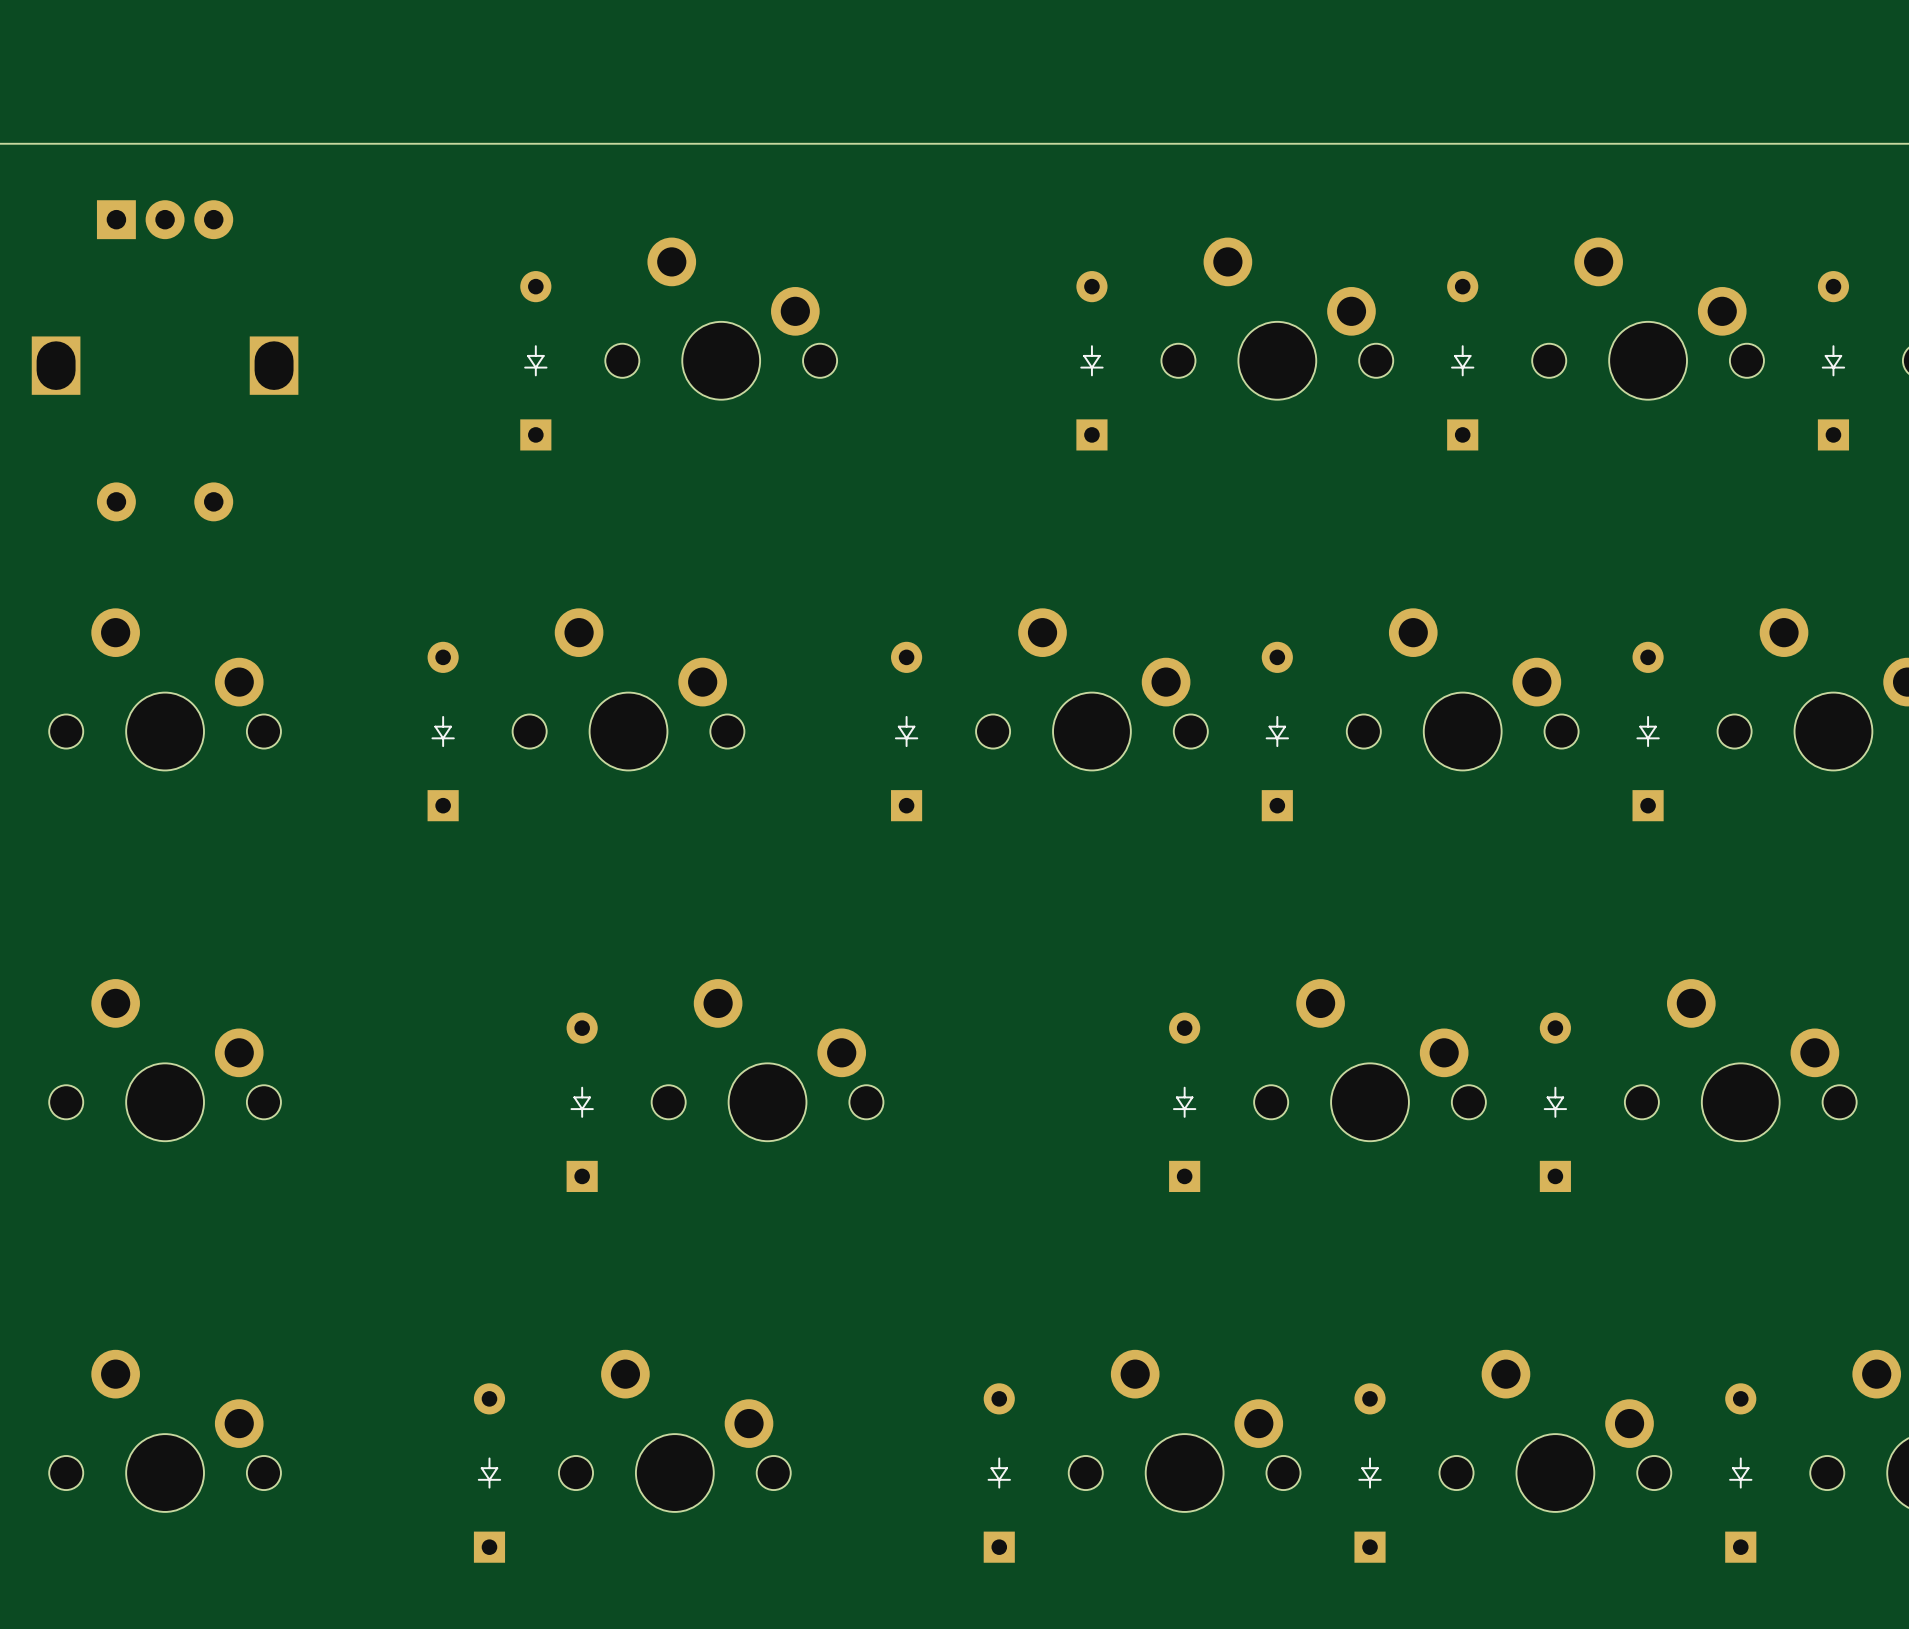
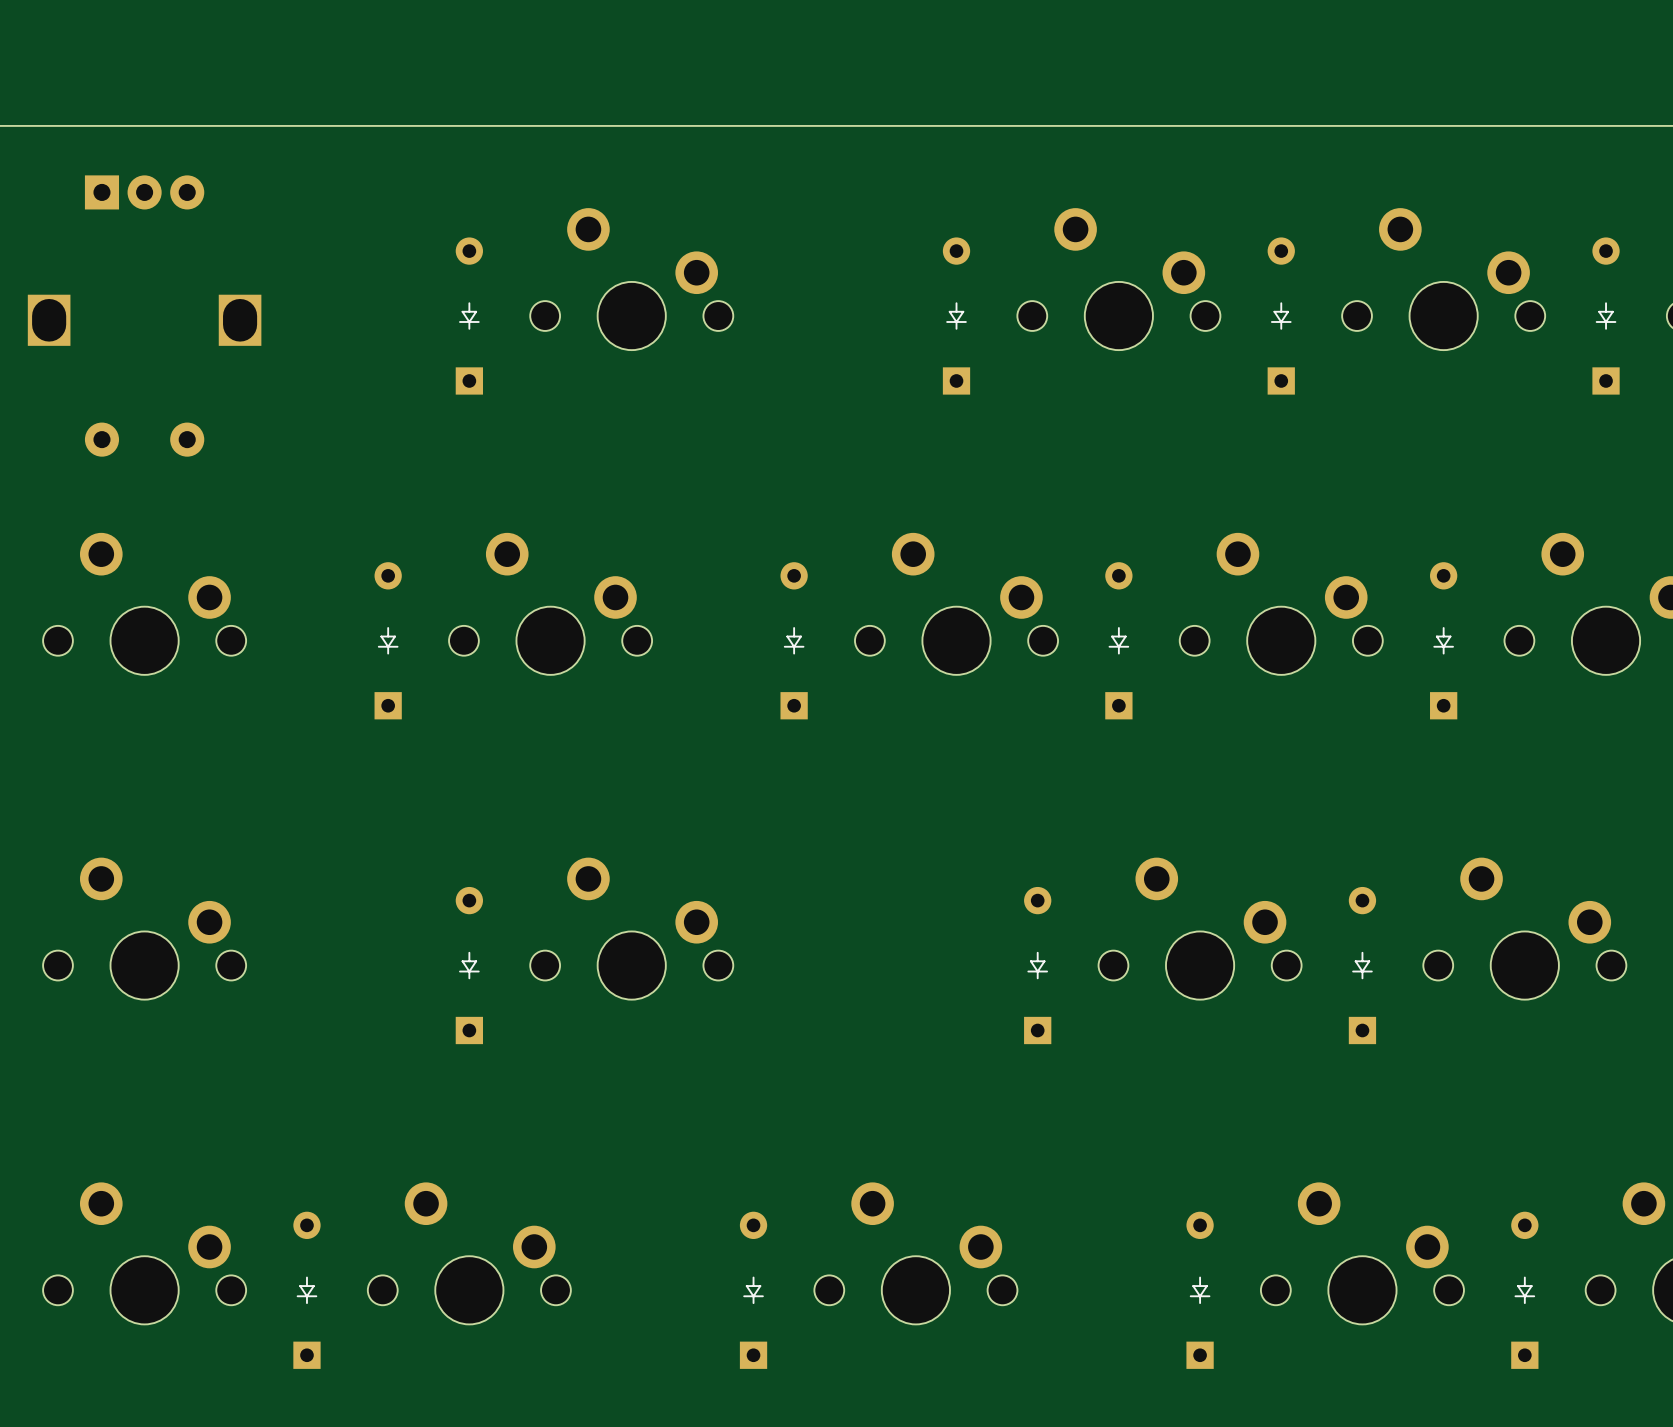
part position: (767, 1060) -> (631, 928)
part position: (582, 1102) -> (469, 965)
part position: (674, 1430) -> (469, 1253)
part position: (1184, 1430) -> (915, 1253)
part position: (489, 1473) -> (306, 1290)
part: none -> (753, 1290)
part: (999, 1473) -> none

